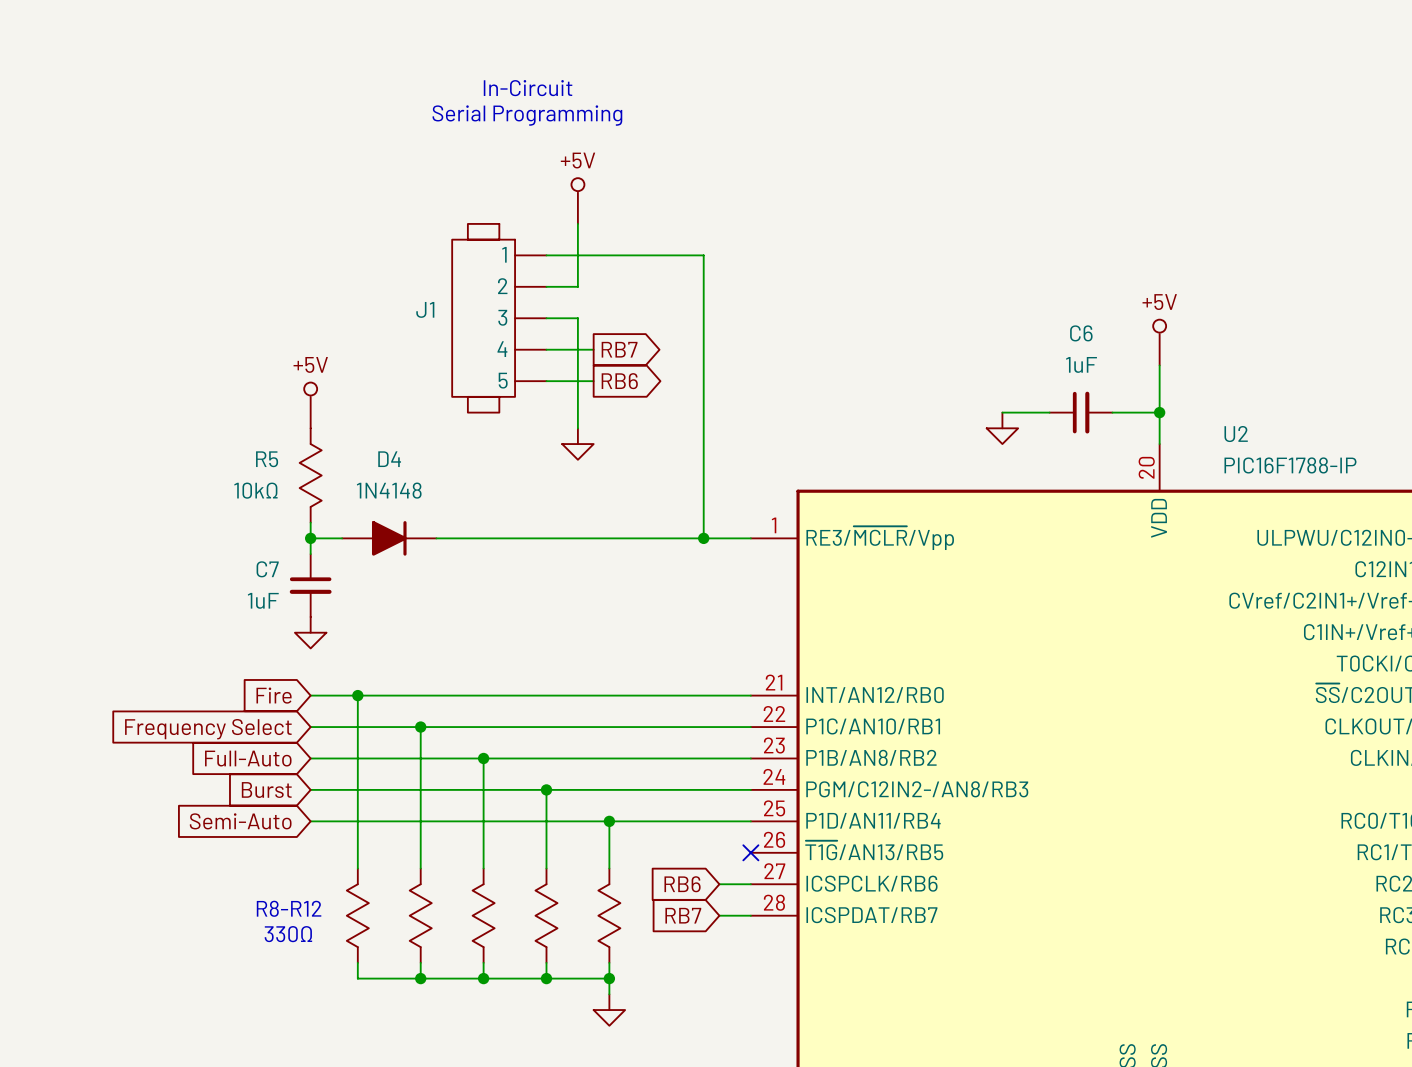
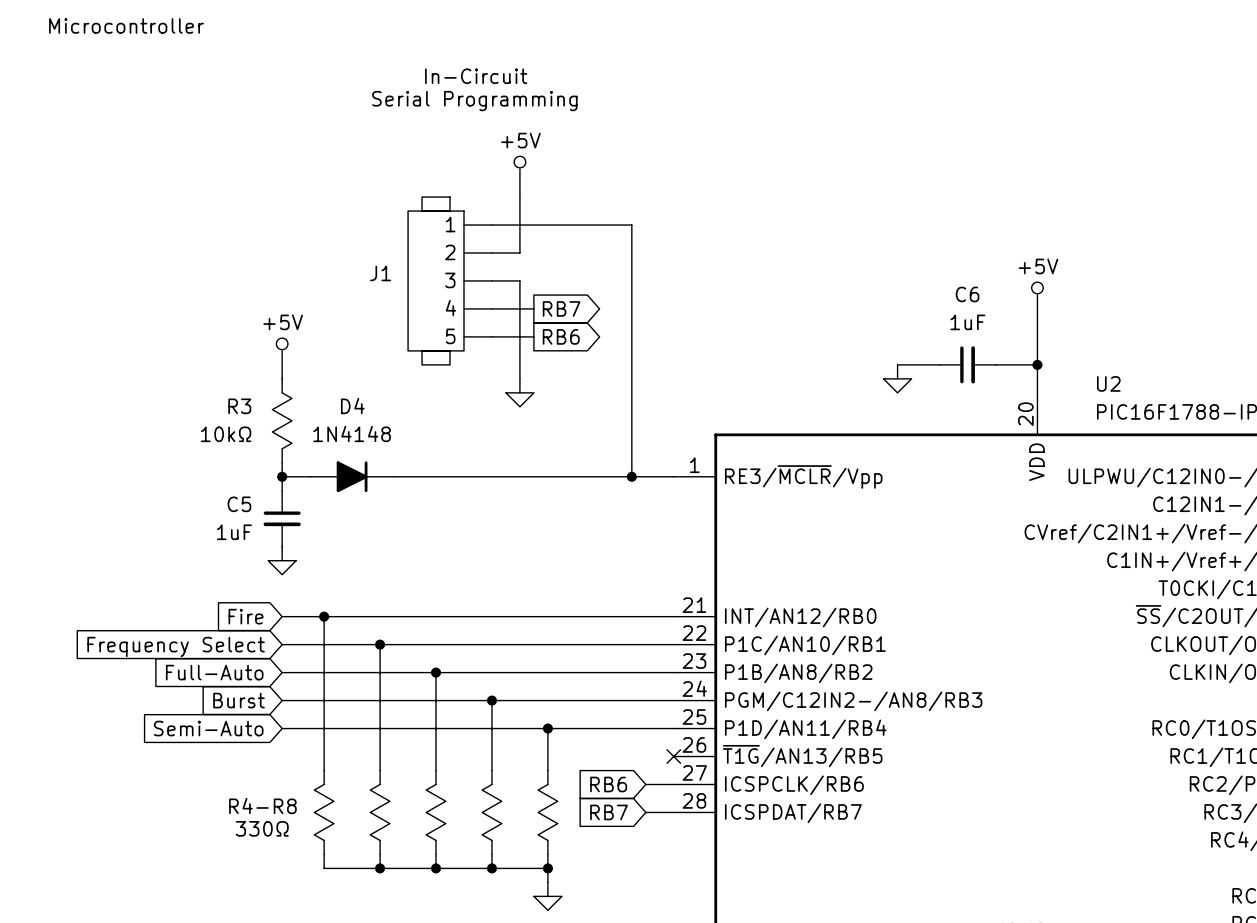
text: none -> Microcontroller (126, 25)
R5 name: R5 (267, 459) -> R3 (239, 406)
C7 name: C7 (267, 569) -> C5 (239, 504)
text: R8-R12 (289, 908) -> R4-R8 (262, 805)

